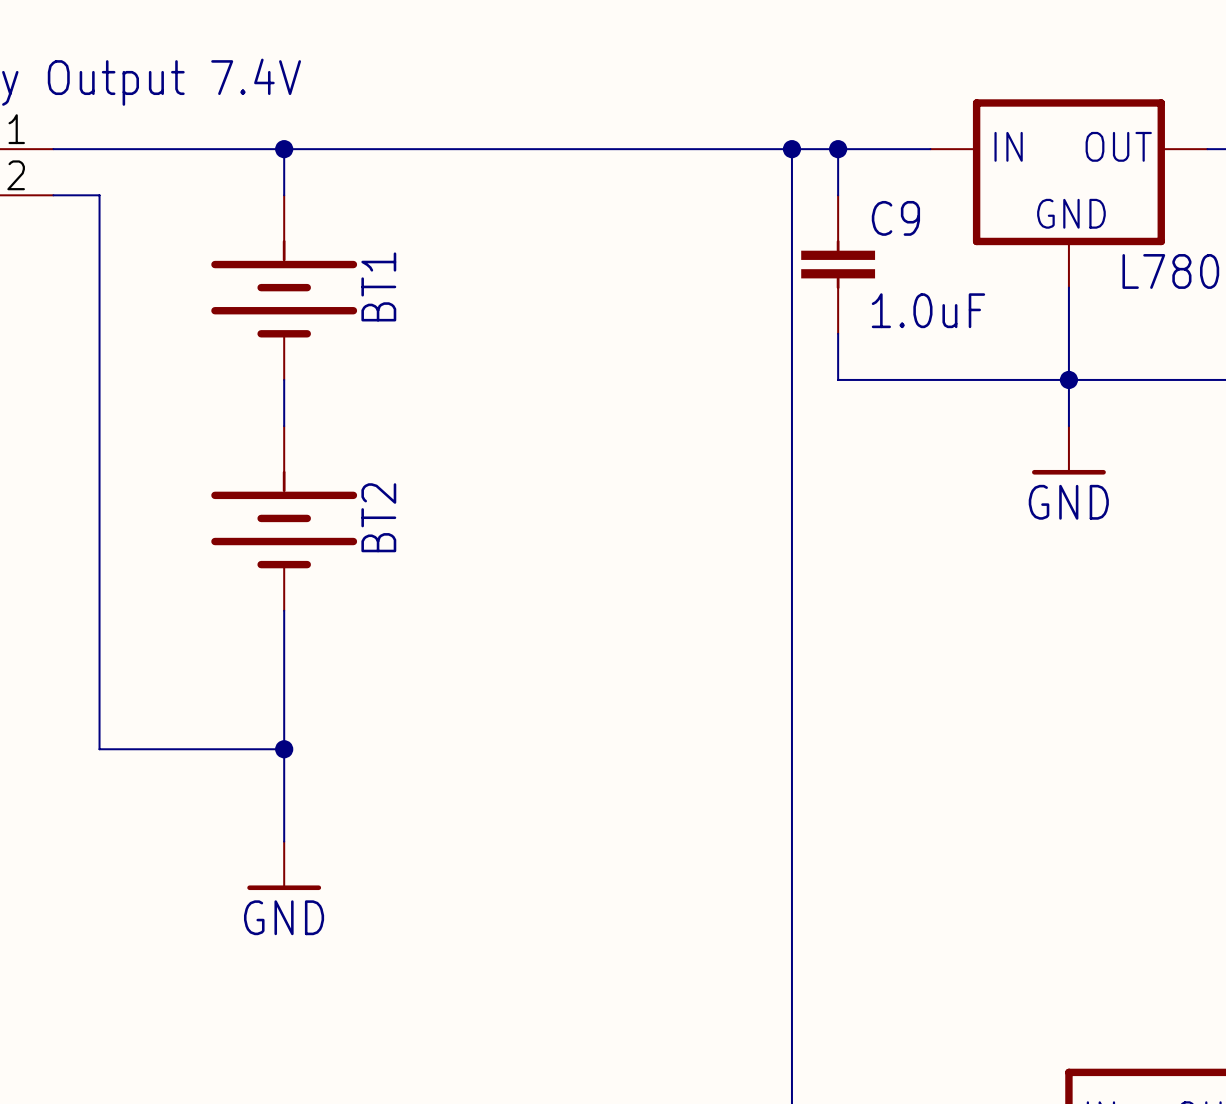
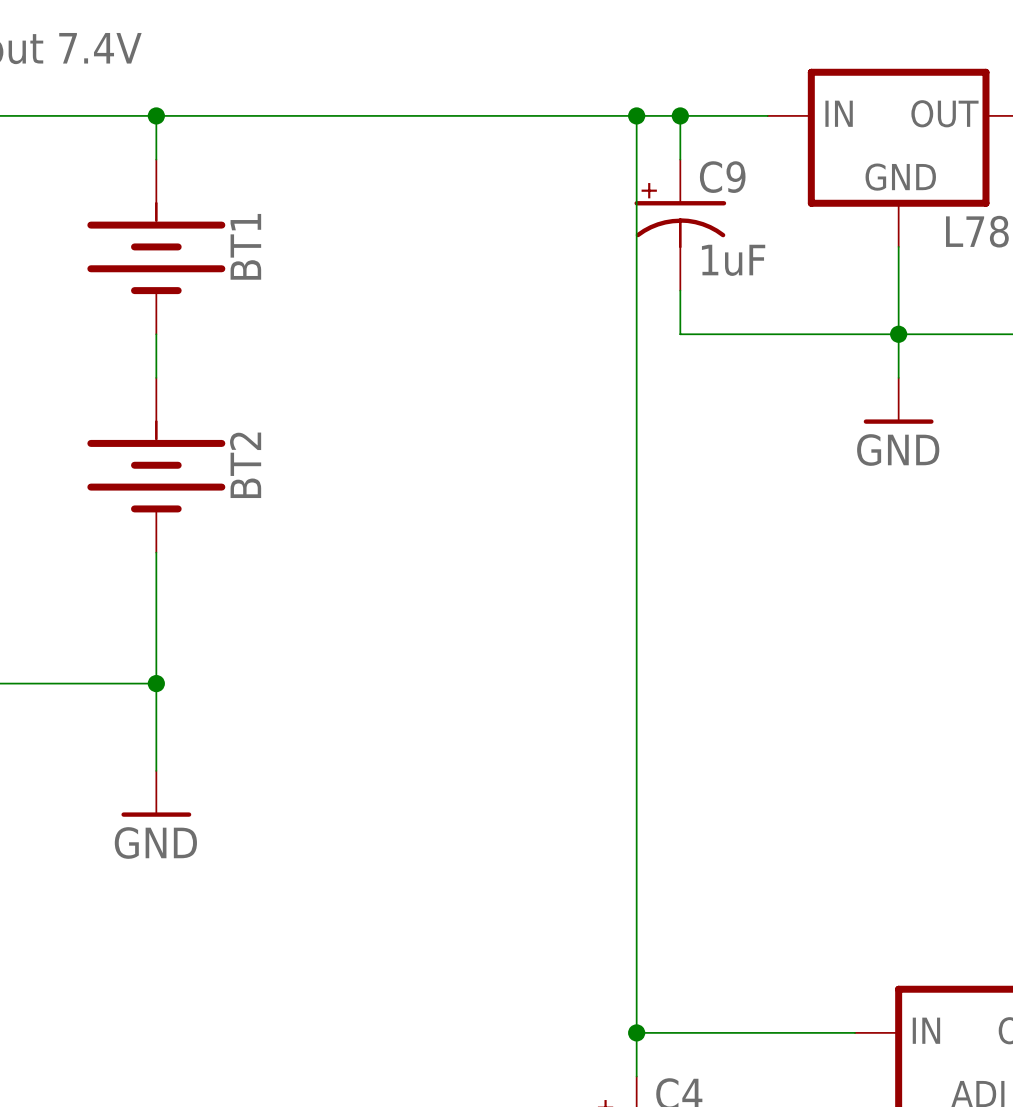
C9 symbol: [801, 195, 876, 334] -> [634, 159, 727, 291]
C9 value: 1.0uF (928, 310) -> 1uF (733, 260)

